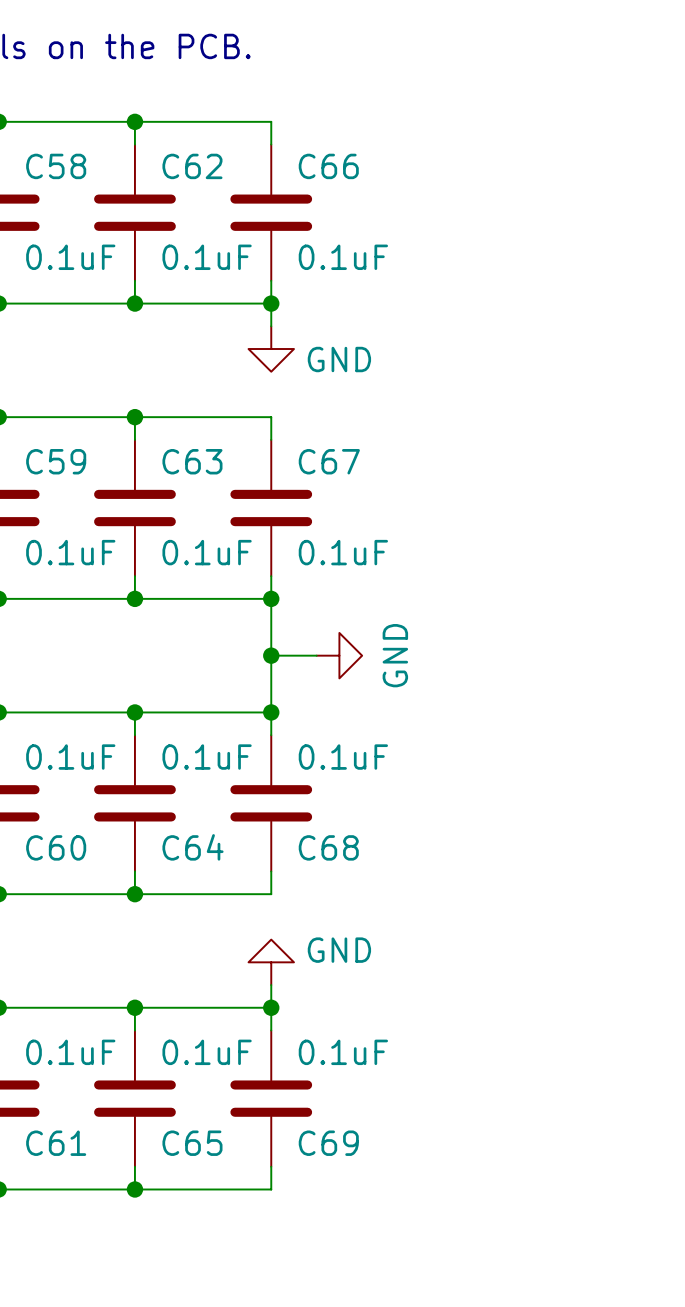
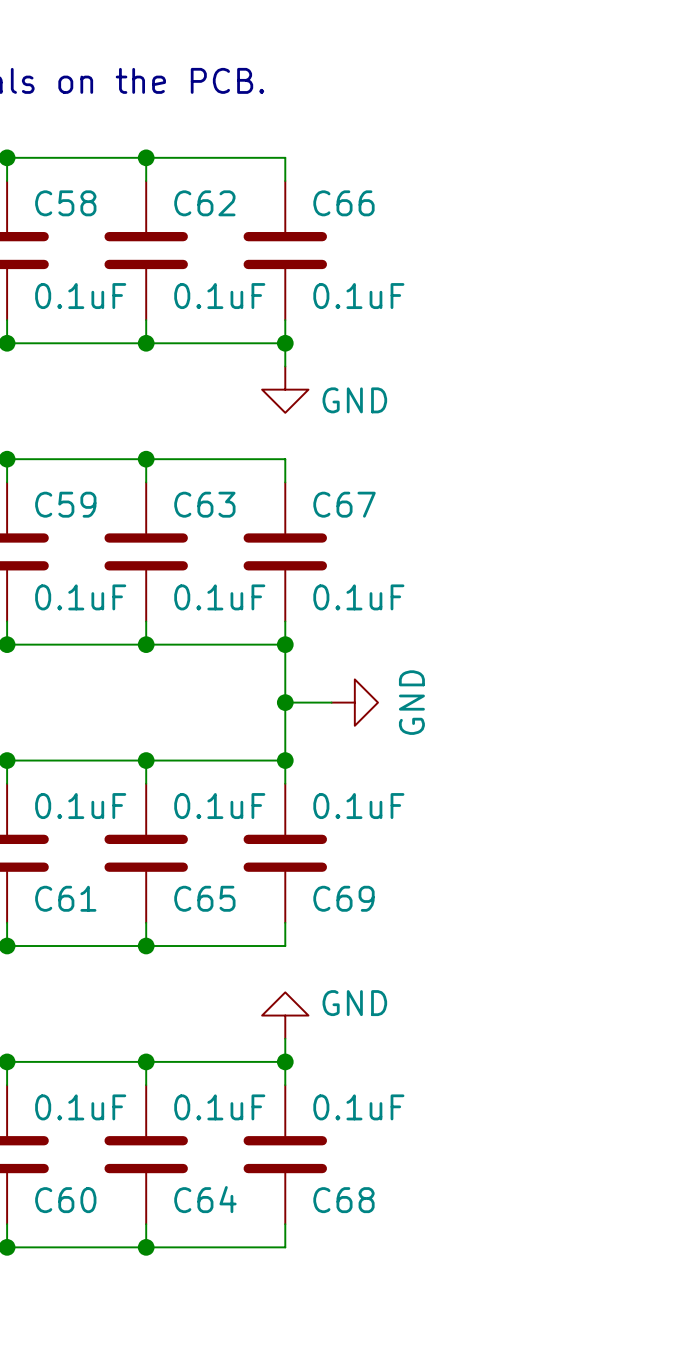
C60 name: C60 (56, 847) -> C61 (65, 898)
C64 name: C64 (193, 847) -> C65 (204, 898)
C68 name: C68 (328, 847) -> C69 (343, 898)
C61 name: C61 (56, 1143) -> C60 (65, 1200)
C65 name: C65 (192, 1143) -> C64 (205, 1199)
C69 name: C69 (328, 1143) -> C68 (343, 1200)

